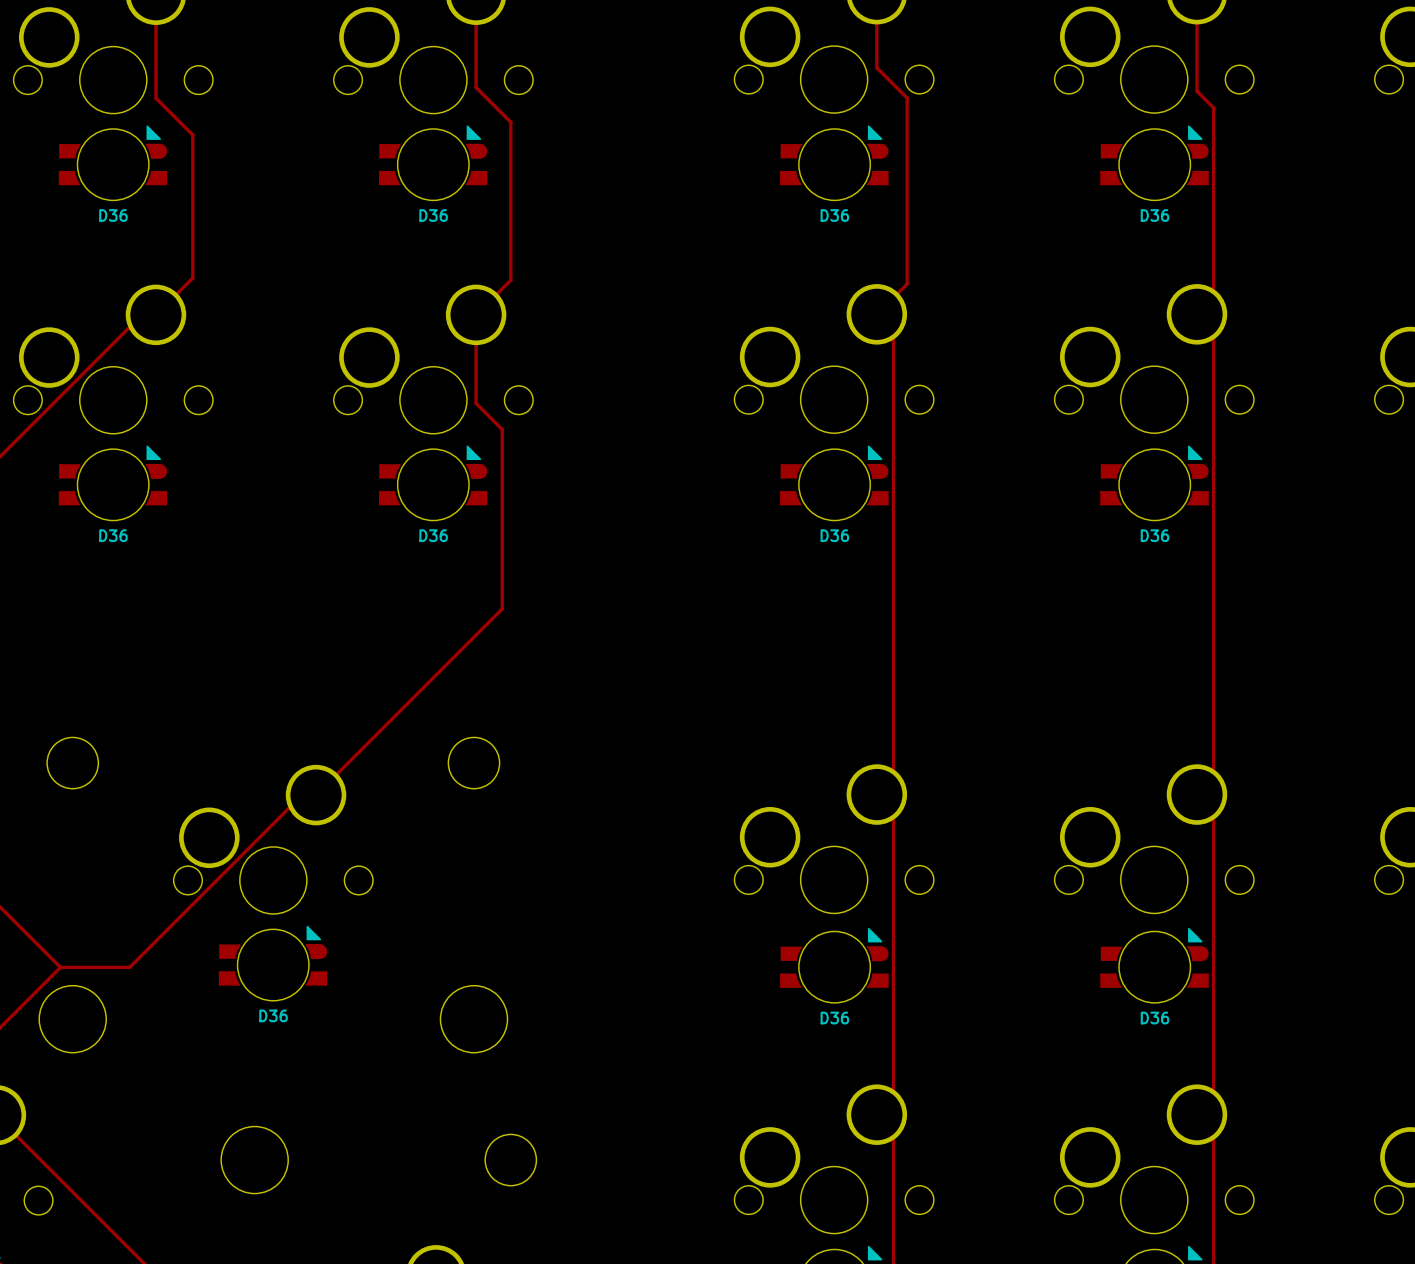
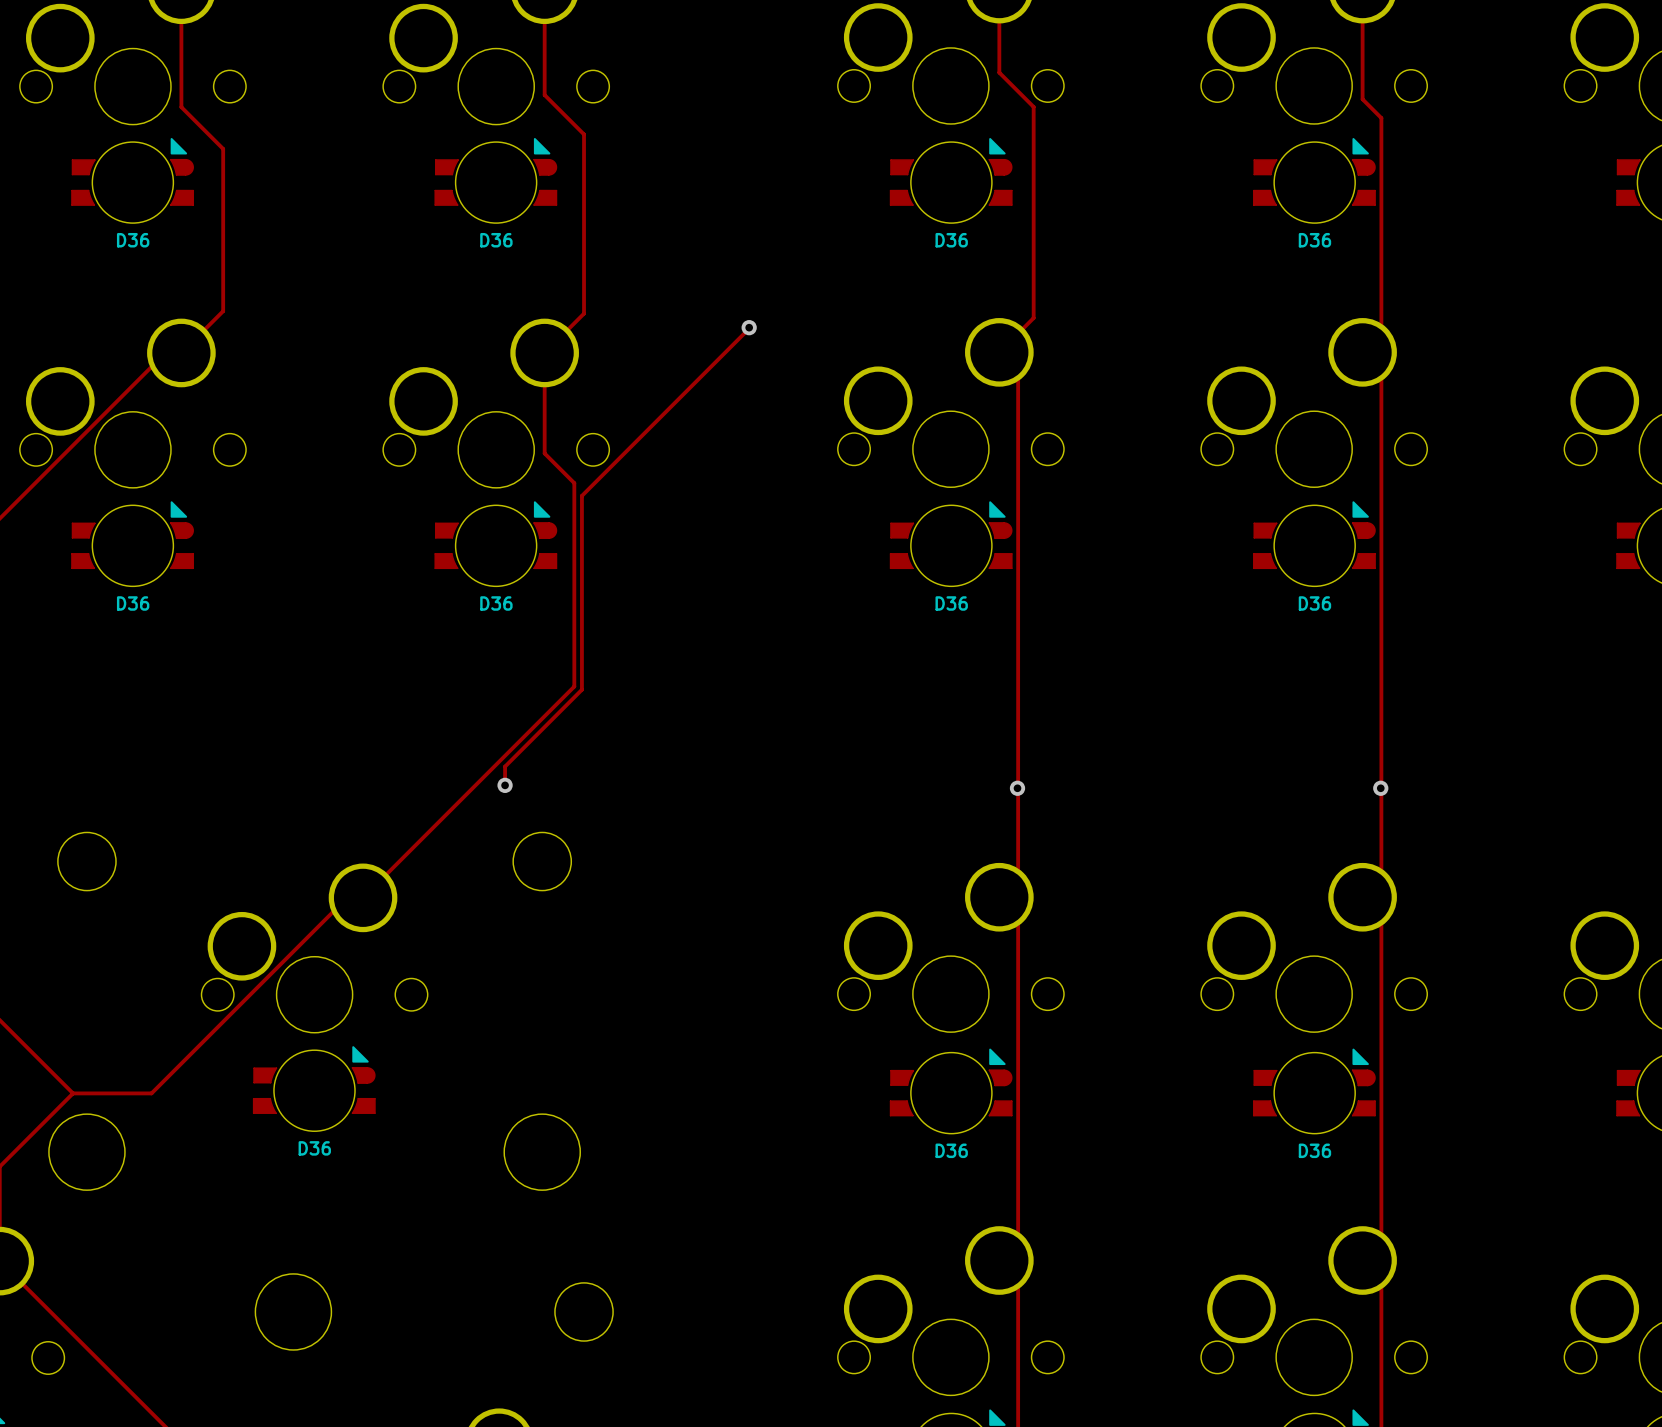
track: none -> (749, 327) (581, 495) (581, 689) (505, 766) (505, 785)
via: none -> (749, 327)
via: none -> (505, 785)
via: none -> (1017, 788)
via: none -> (1380, 788)

